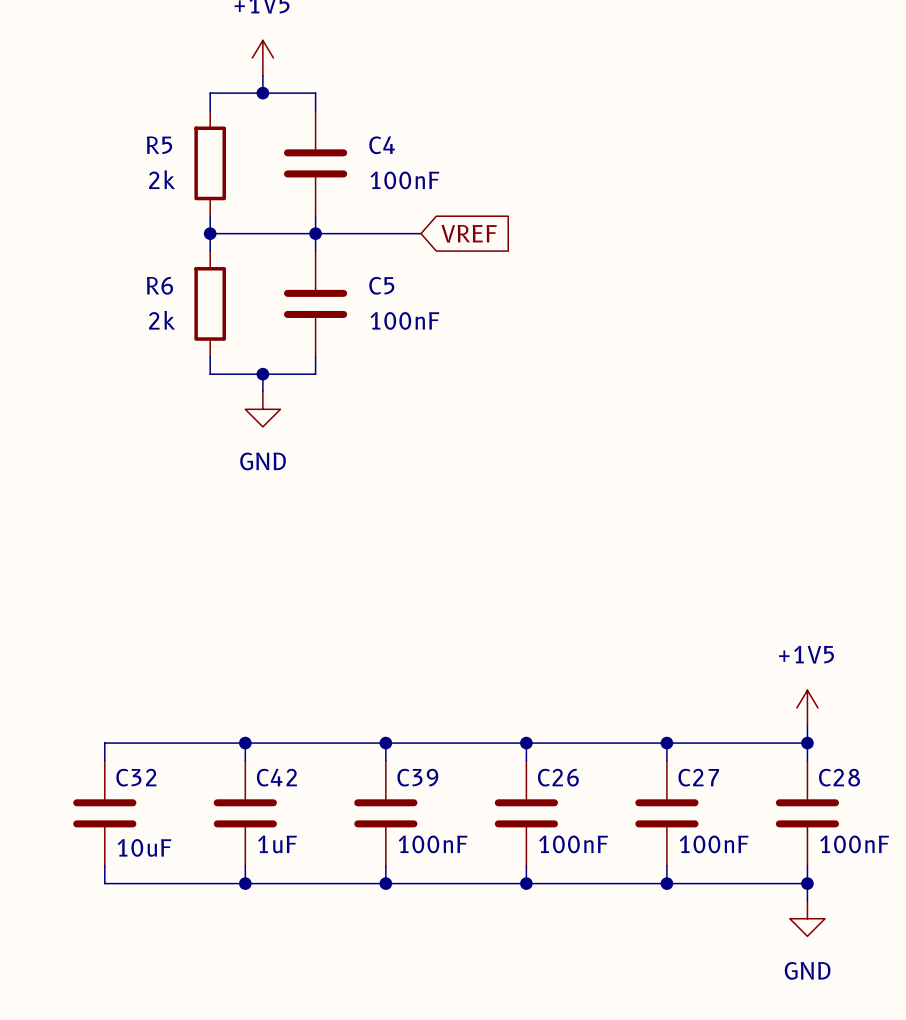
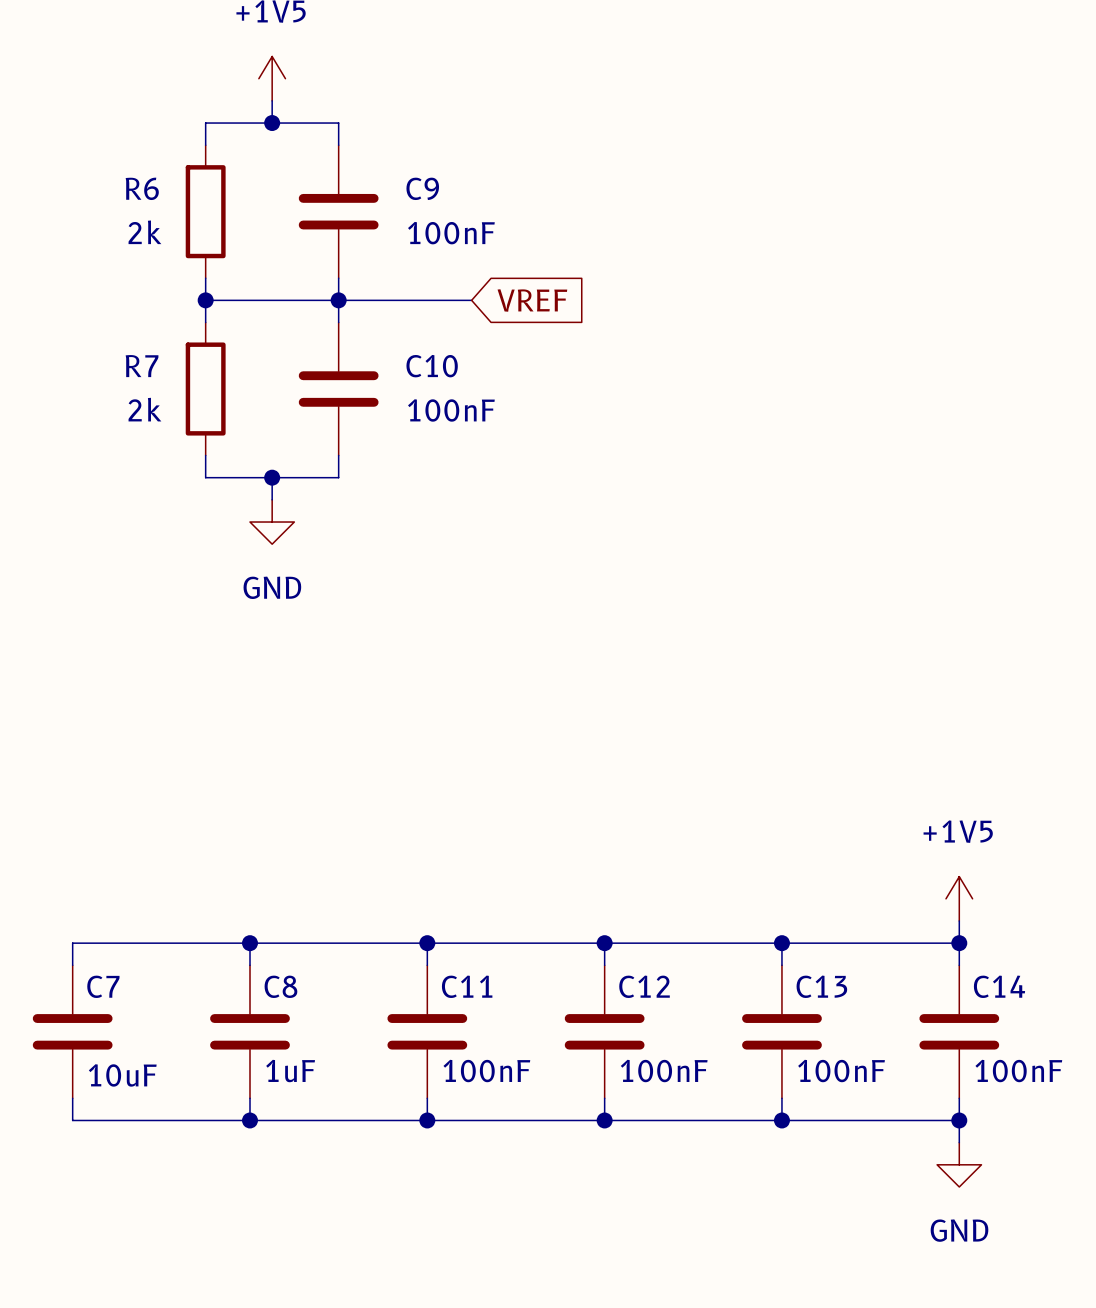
R5 name: R5 (159, 145) -> R6 (142, 188)
C4 name: C4 (382, 145) -> C9 (422, 188)
R6 name: R6 (159, 285) -> R7 (142, 366)
C5 name: C5 (381, 285) -> C10 (432, 366)
C32 name: C32 (136, 777) -> C7 (103, 986)
C42 name: C42 (276, 777) -> C8 (280, 986)
C39 name: C39 (417, 777) -> C11 (467, 986)
C26 name: C26 (558, 777) -> C12 (644, 986)
C27 name: C27 (698, 777) -> C13 (821, 986)
C28 name: C28 (839, 777) -> C14 (999, 986)

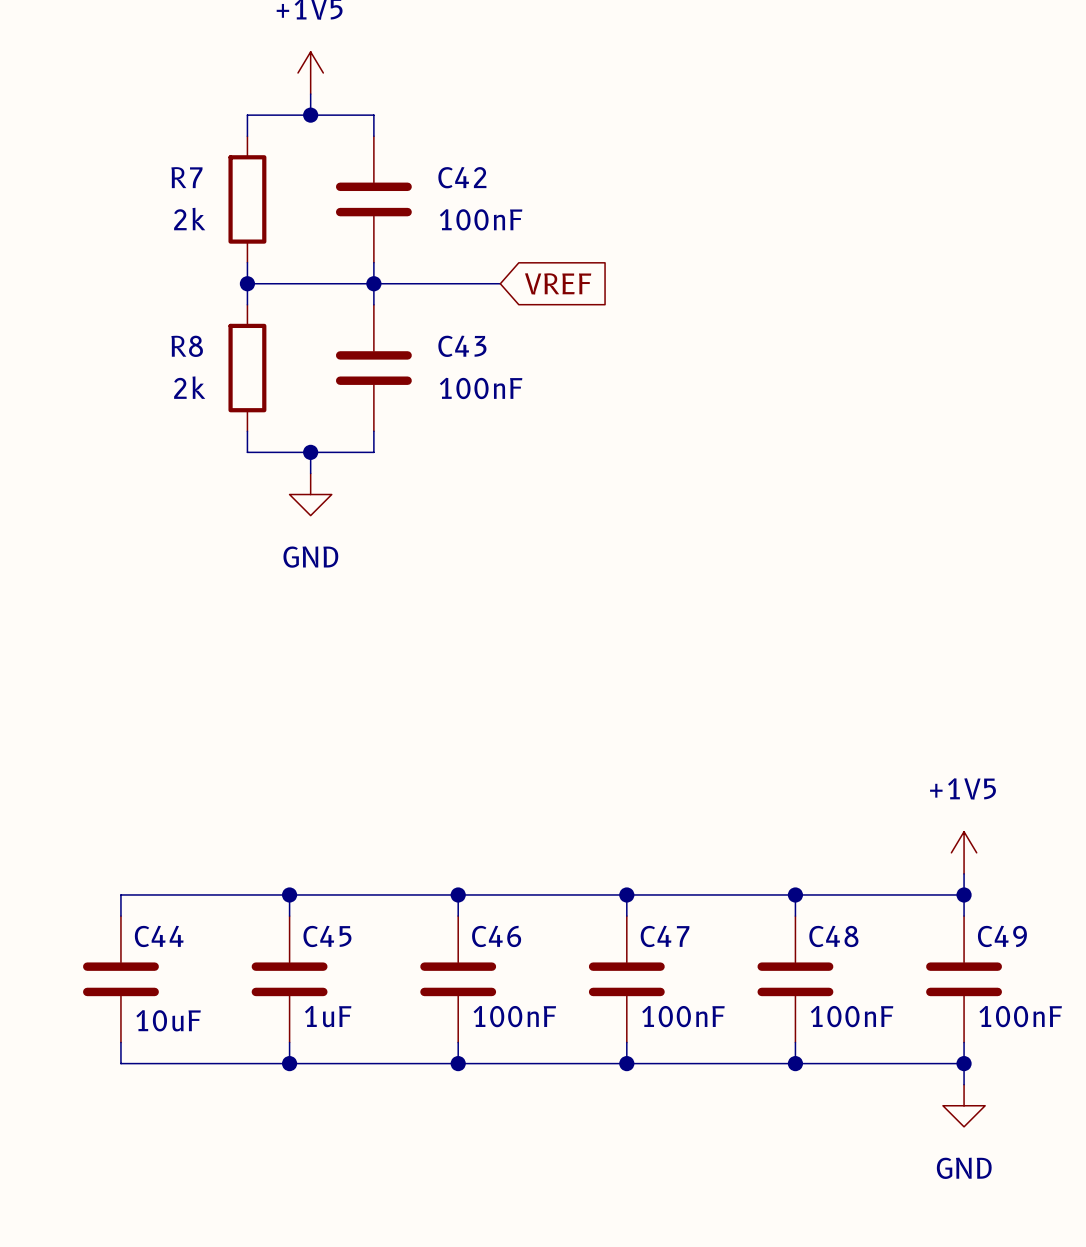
R6 name: R6 (142, 188) -> R7 (186, 177)
C9 name: C9 (422, 188) -> C42 (462, 177)
R7 name: R7 (142, 366) -> R8 (187, 346)
C10 name: C10 (432, 366) -> C43 (462, 346)
C7 name: C7 (103, 986) -> C44 (159, 936)
C8 name: C8 (280, 986) -> C45 (327, 936)
C11 name: C11 (467, 986) -> C46 (496, 936)
C12 name: C12 (644, 986) -> C47 (665, 936)
C13 name: C13 (821, 986) -> C48 (833, 936)
C14 name: C14 (999, 986) -> C49 (1002, 936)

